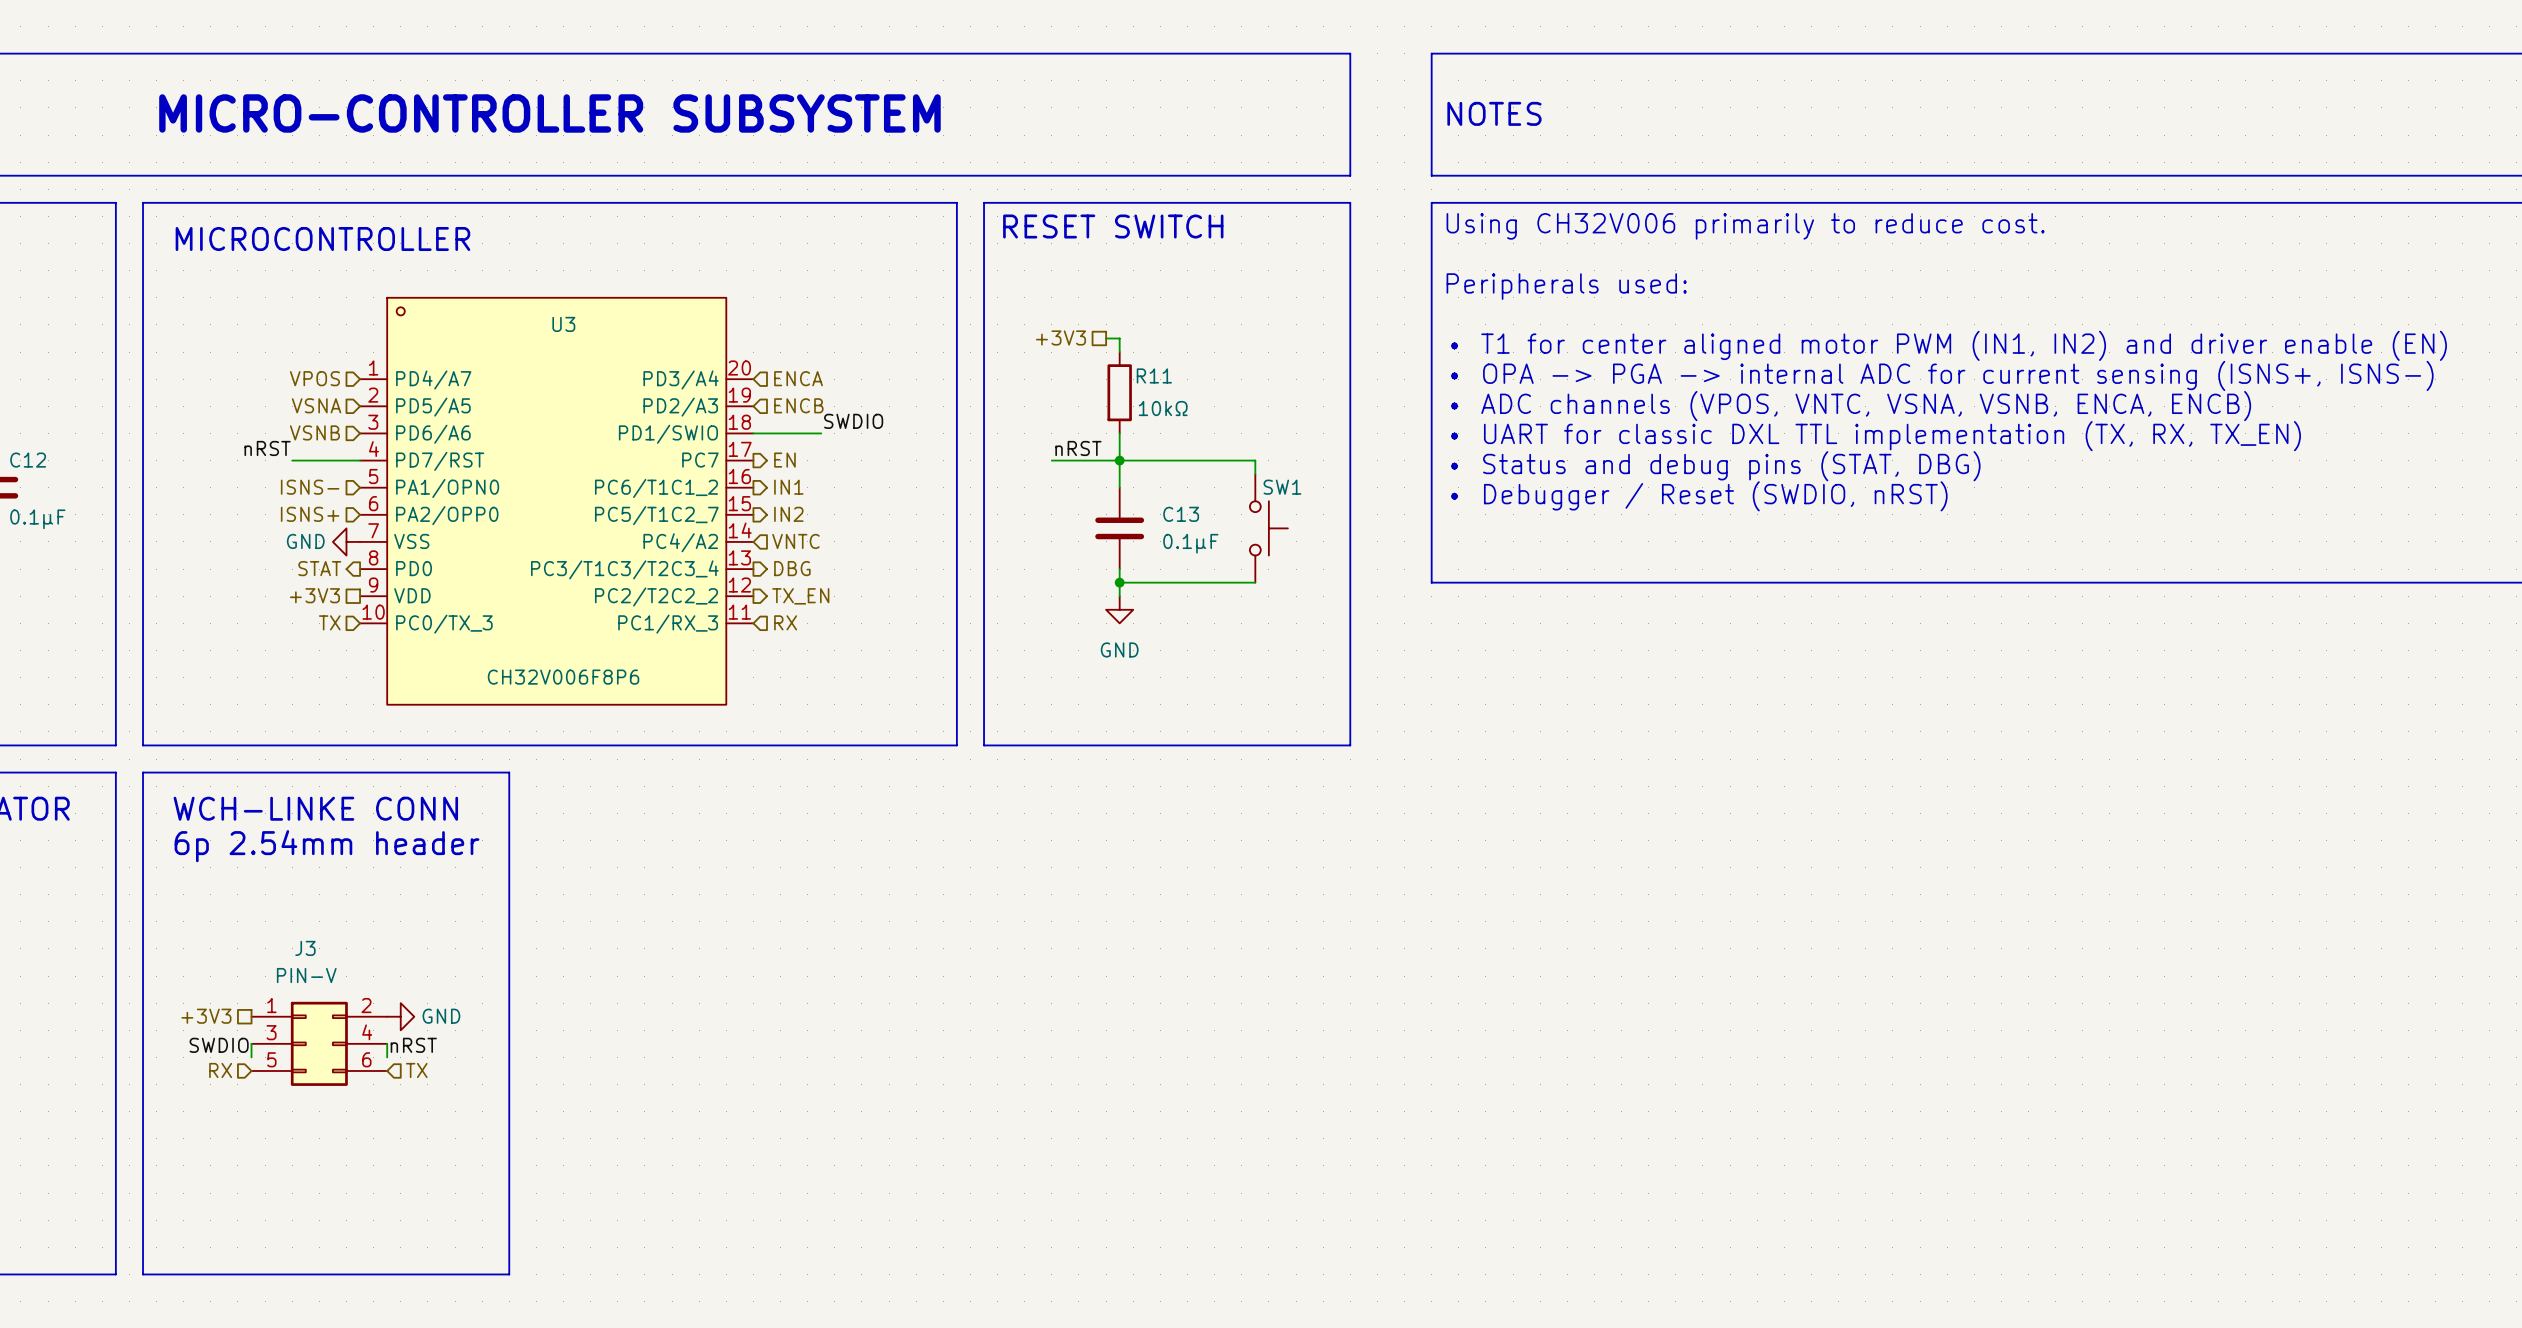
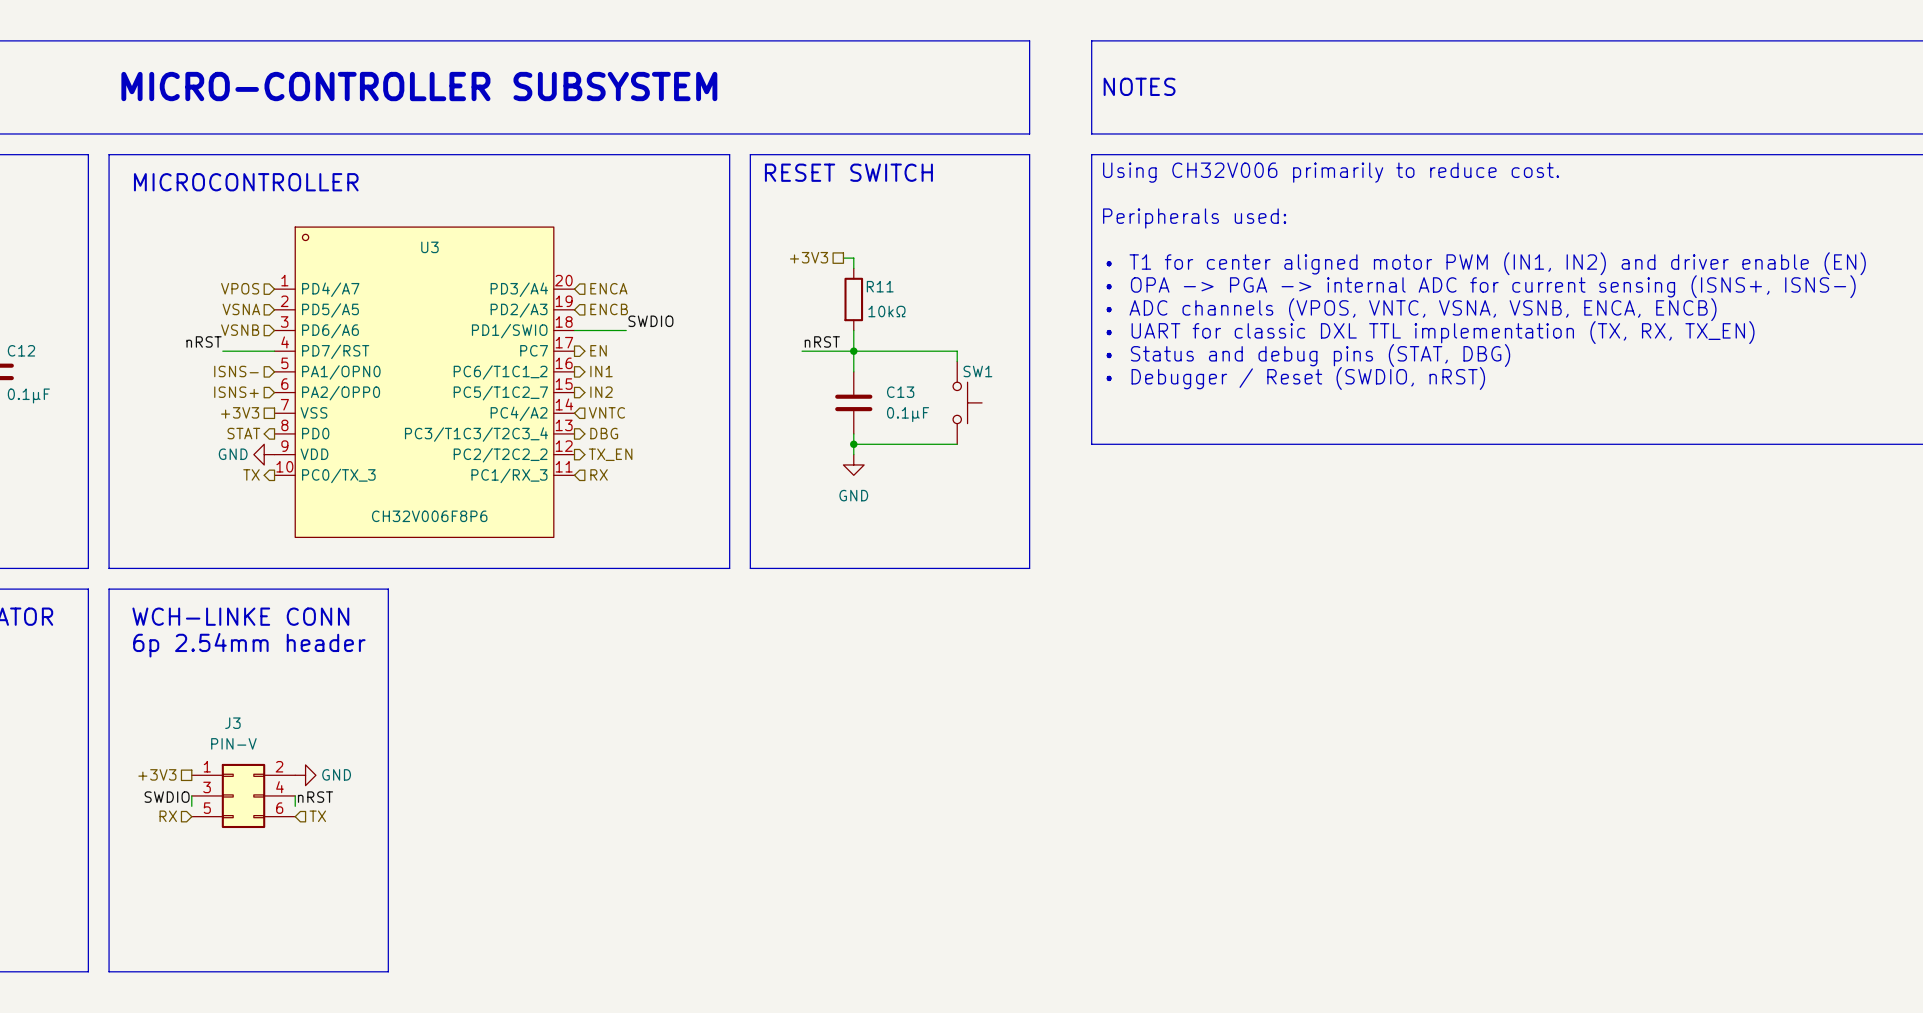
power symbol position: GND (346, 541) -> GND (264, 454)
hierarchical label position: +3V3 (314, 595) -> +3V3 (240, 412)
hierarchical label shape: input (329, 622) -> output (251, 474)

